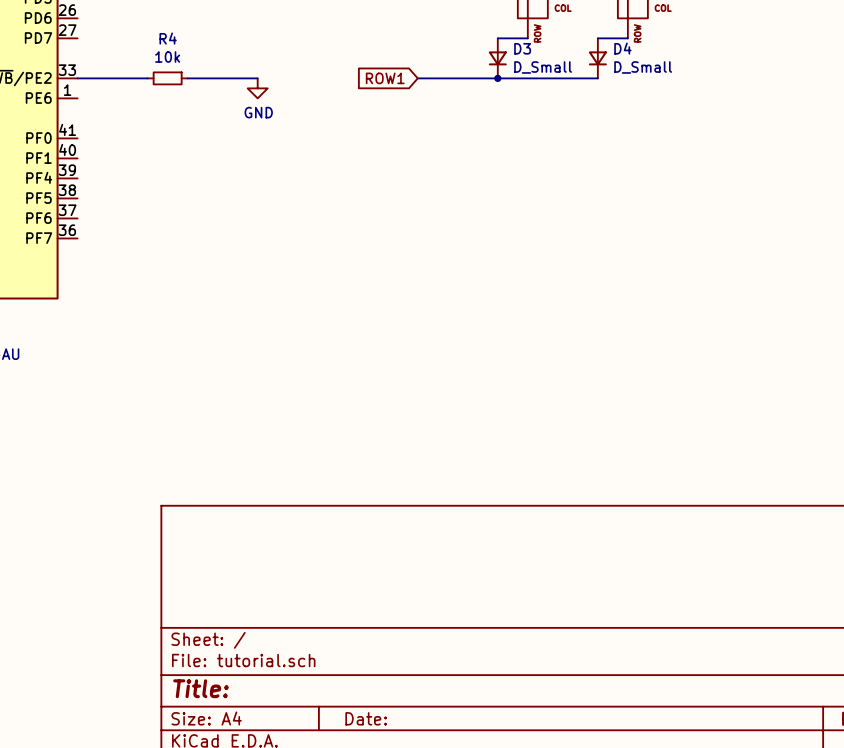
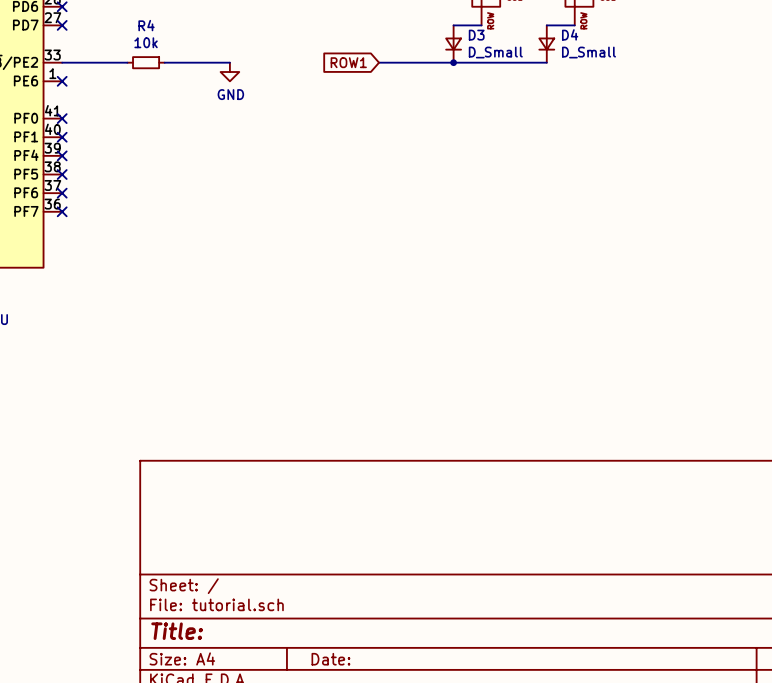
no-connect mark: none -> (62, 6)
no-connect mark: none -> (62, 25)
no-connect mark: none -> (62, 81)
no-connect mark: none -> (62, 118)
no-connect mark: none -> (62, 137)
no-connect mark: none -> (62, 155)
no-connect mark: none -> (62, 174)
no-connect mark: none -> (62, 193)
no-connect mark: none -> (62, 211)

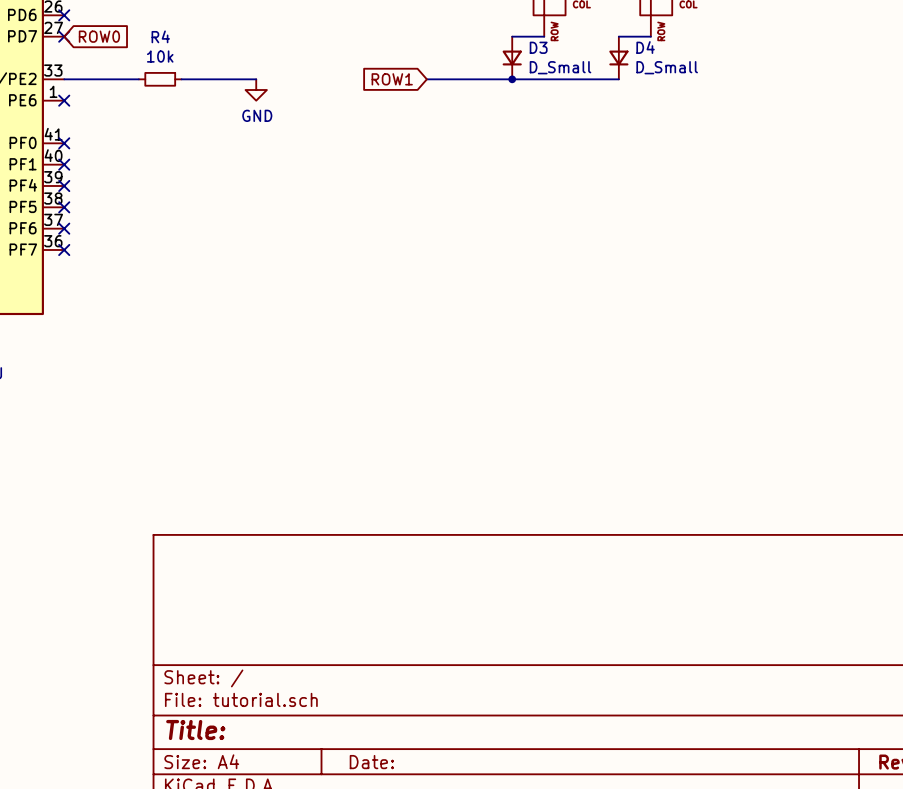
global label: none -> ROW0 (99, 36)

